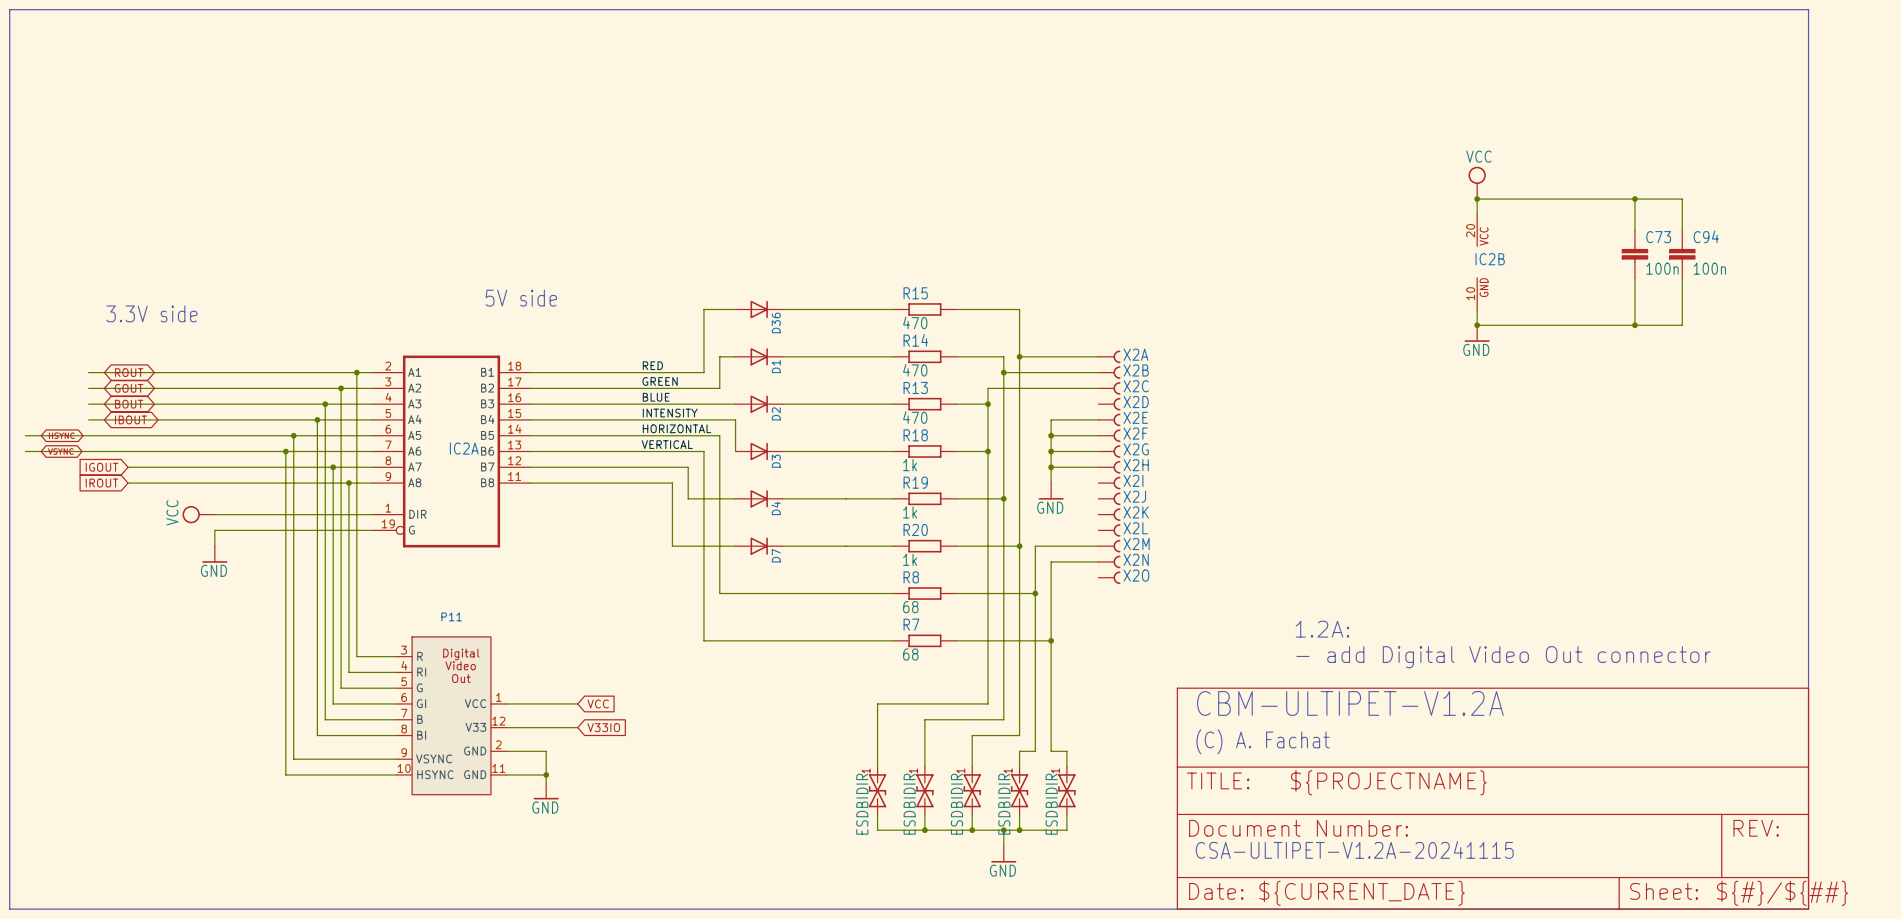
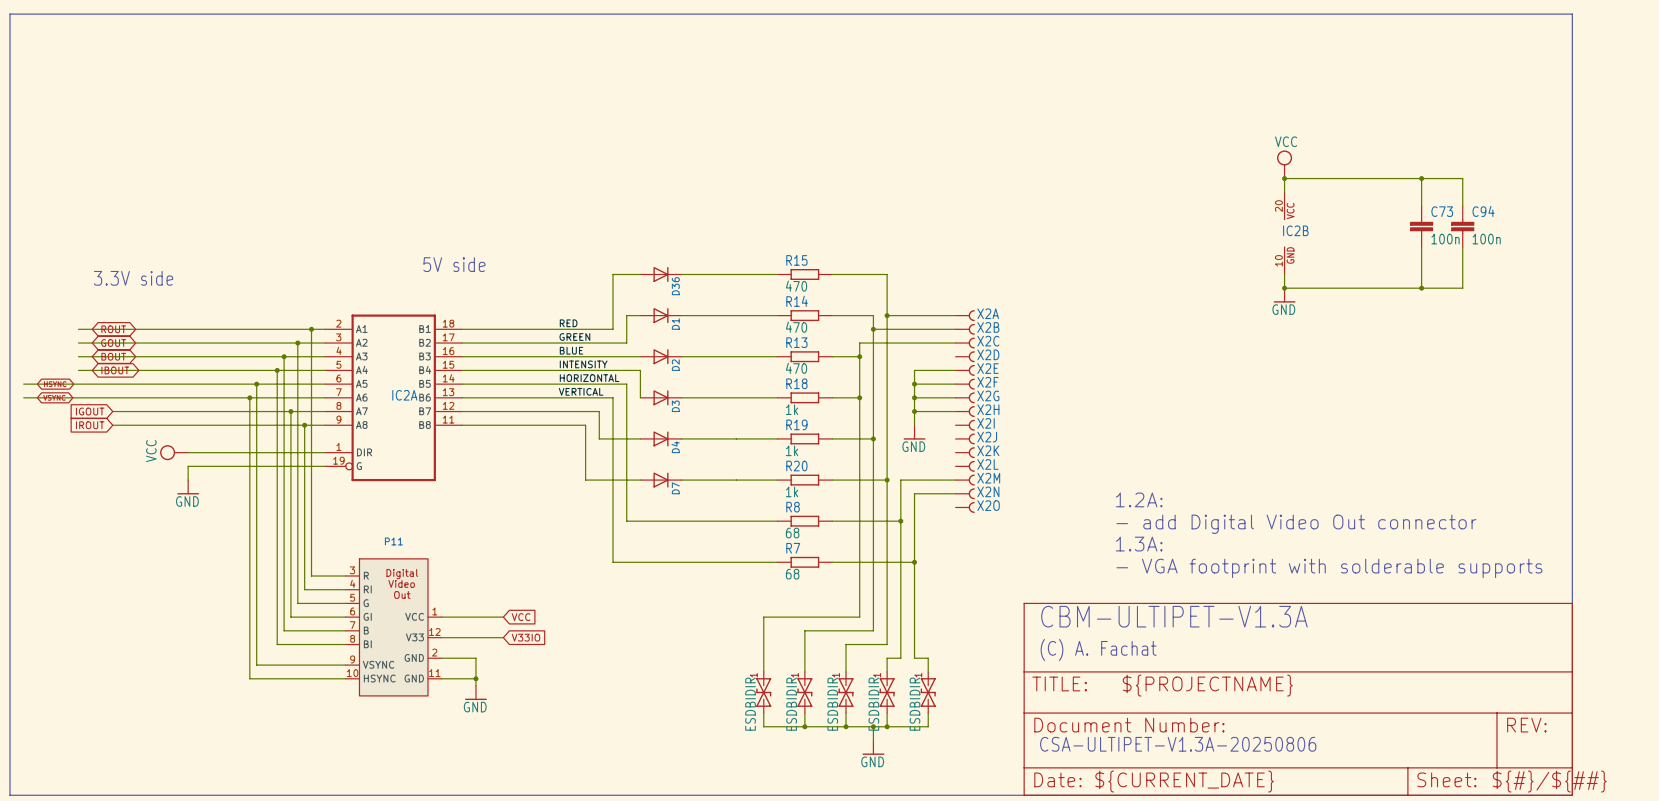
text: none -> 1.3A: (1139, 544)
text position: 1.2A: (1322, 629) -> 1.2A: (1139, 499)
text: none -> - VGA footprint with solderable supports (1329, 568)
text position: - add Digital Video Out connector (1503, 657) -> - add Digital Video Out connector (1296, 524)
text: CBM-ULTIPET-V1.2A (1350, 703) -> CBM-ULTIPET-V1.3A (1174, 616)
text: CSA-ULTIPET-V1.2A-20241115 (1354, 850) -> CSA-ULTIPET-V1.3A-20250806 (1178, 744)

